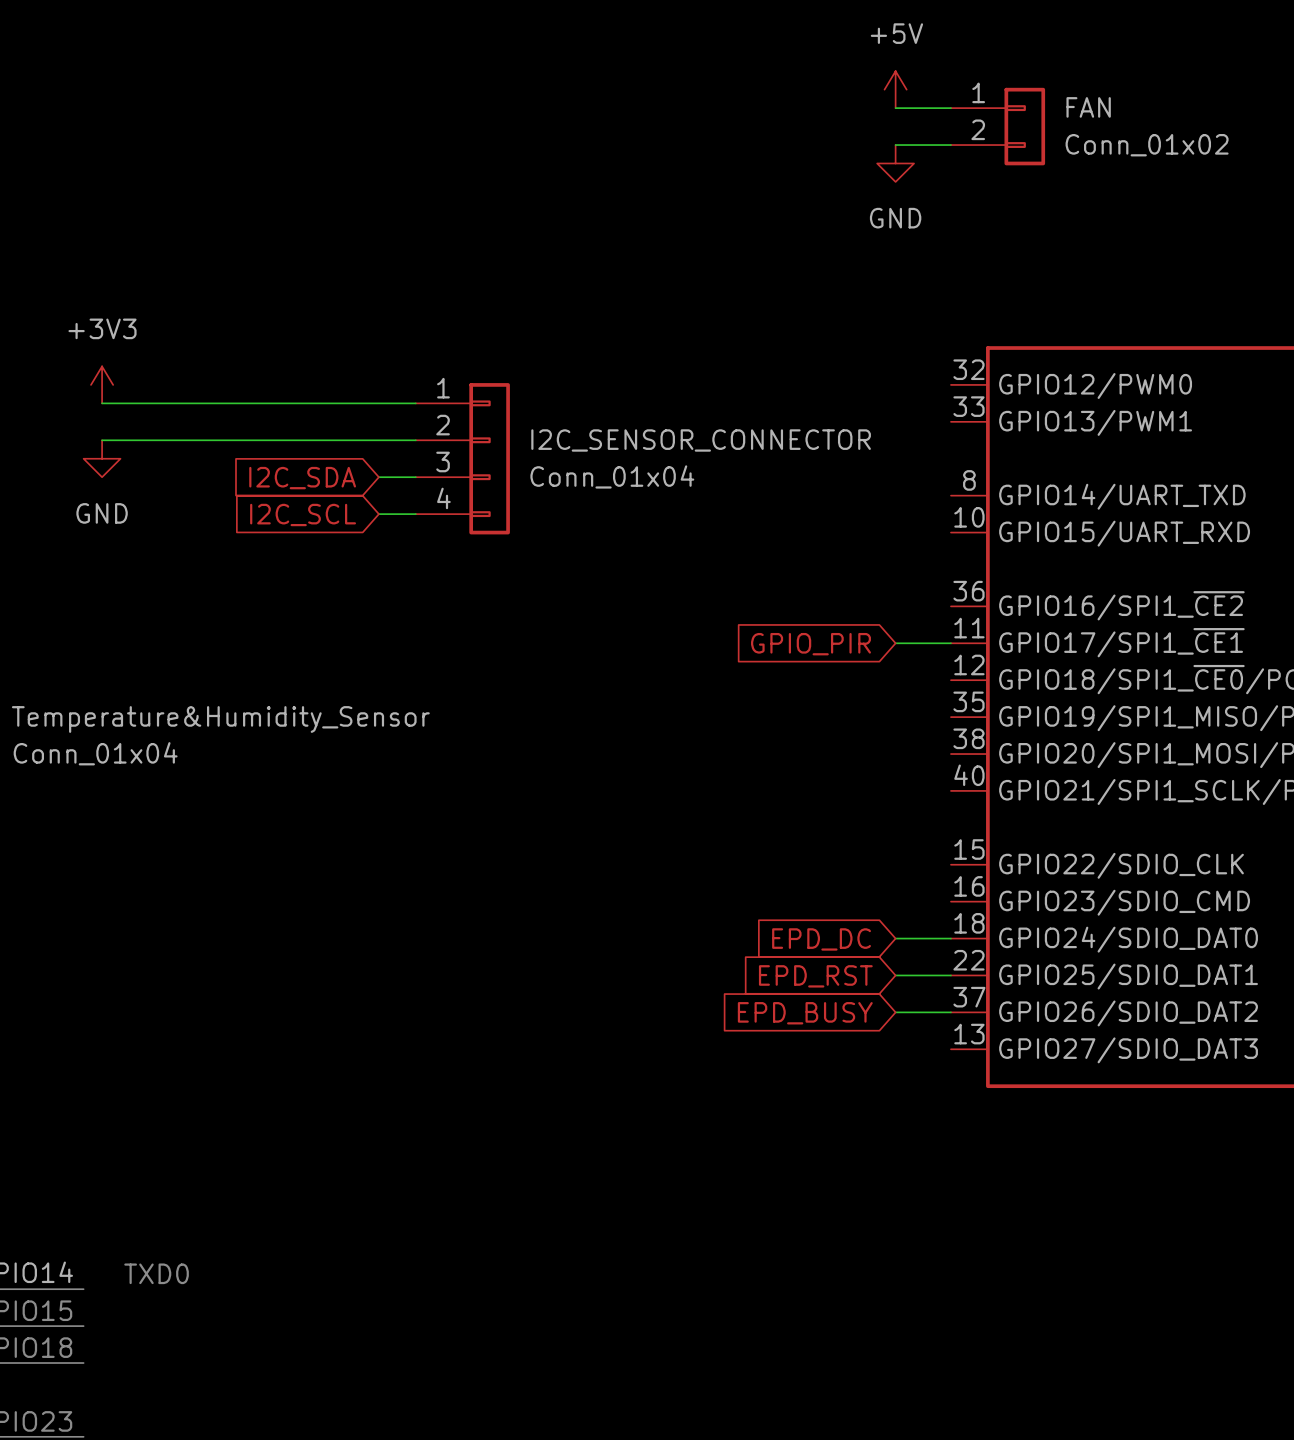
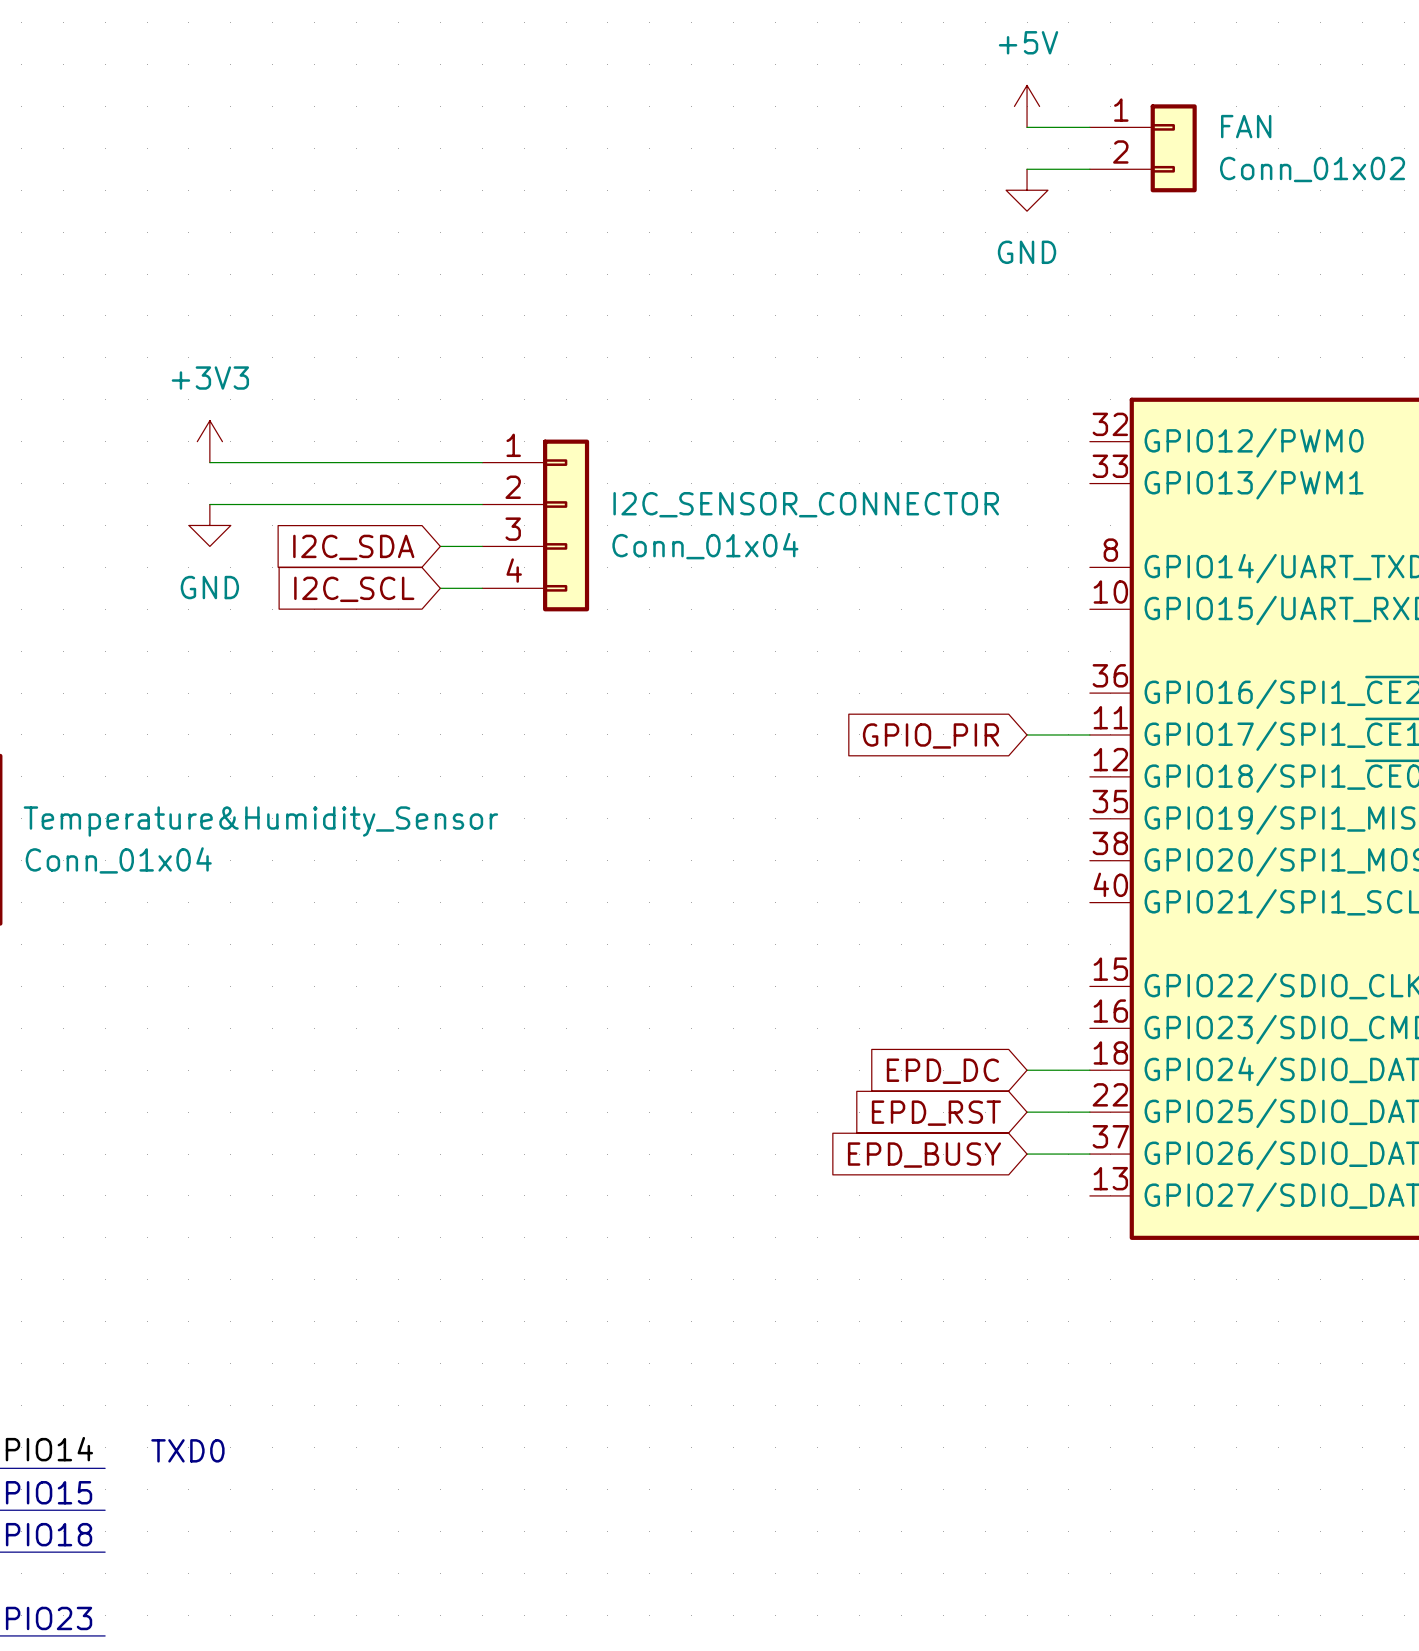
power symbol position: +3V3 (102, 384) -> +3V3 (209, 441)
wire: (102, 403) (175, 403) -> none
wire: (102, 440) (175, 440) -> none
power symbol position: GND (102, 458) -> GND (209, 525)

